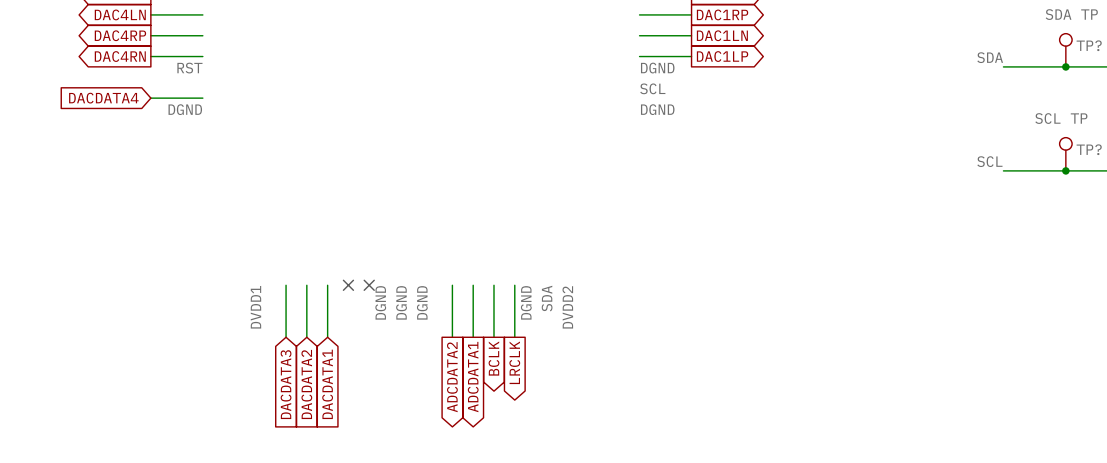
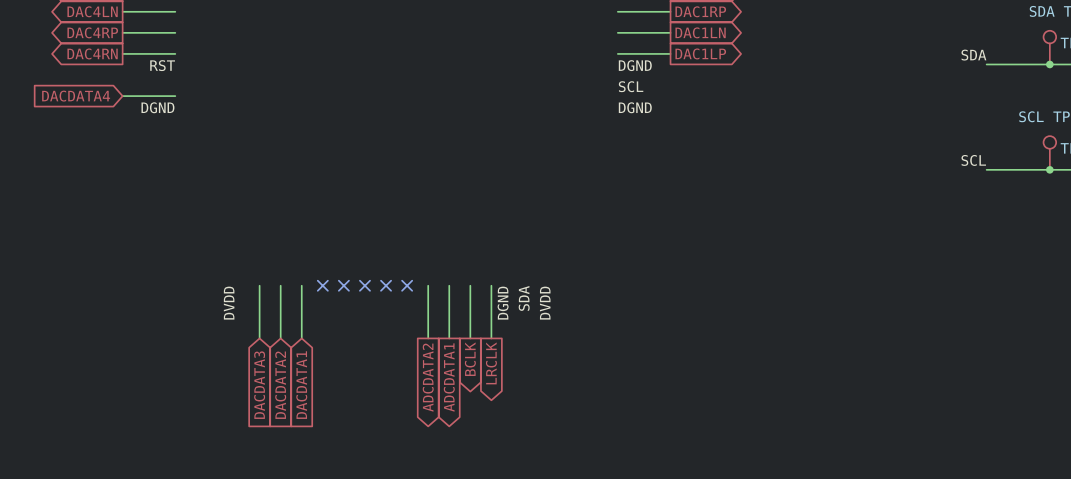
no-connect mark: none -> (364, 285)
no-connect mark: none -> (386, 285)
no-connect mark: none -> (407, 285)
label: DGND (380, 302) -> none
label: DGND (401, 302) -> none
label: DGND (422, 302) -> none
label: DVDD1 (255, 307) -> DVDD (229, 303)
label: DVDD2 (567, 307) -> DVDD (545, 303)

